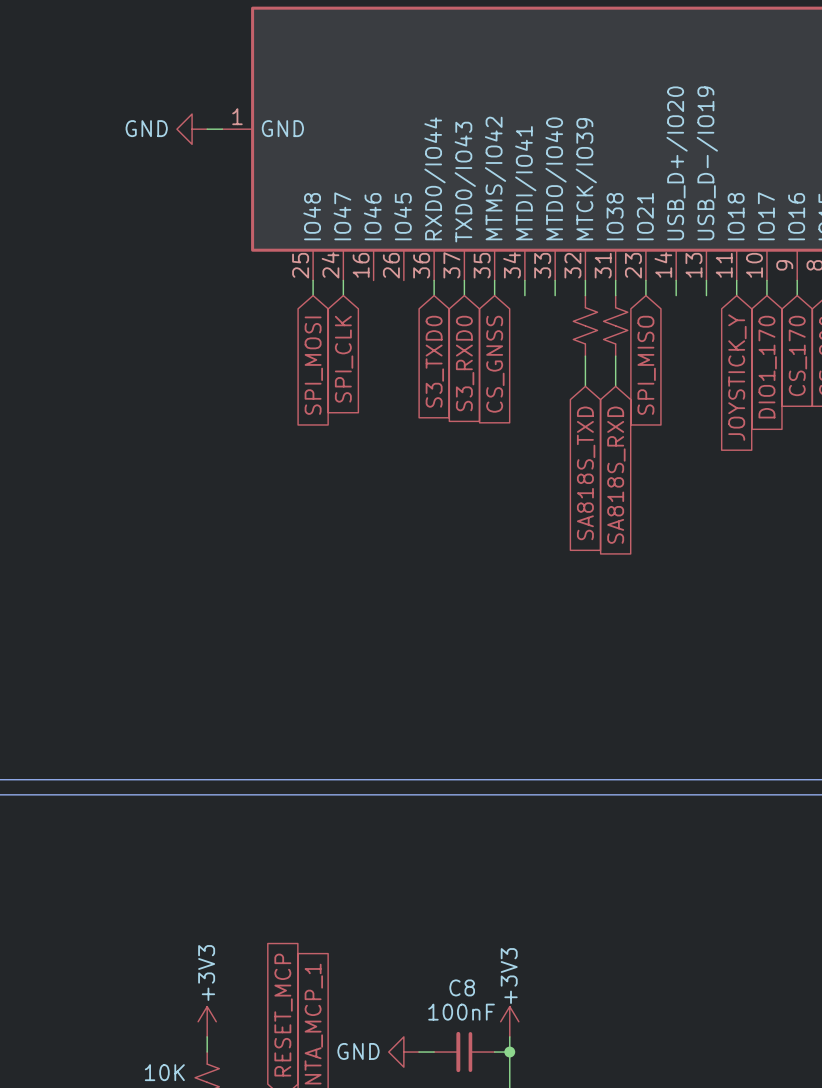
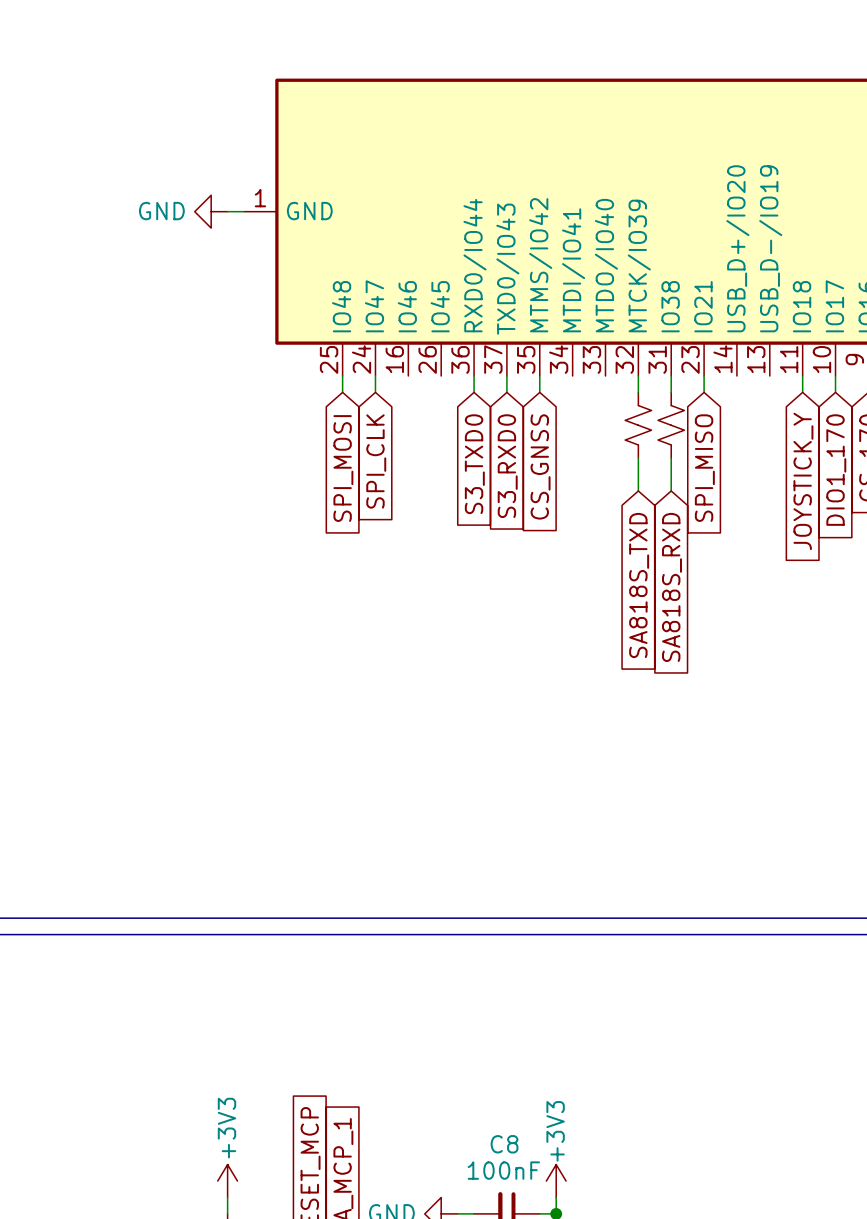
wire: (524, 280) (524, 295) -> none
wire: (555, 280) (555, 295) -> none
wire: (676, 280) (676, 295) -> none
wire: (706, 280) (706, 295) -> none

